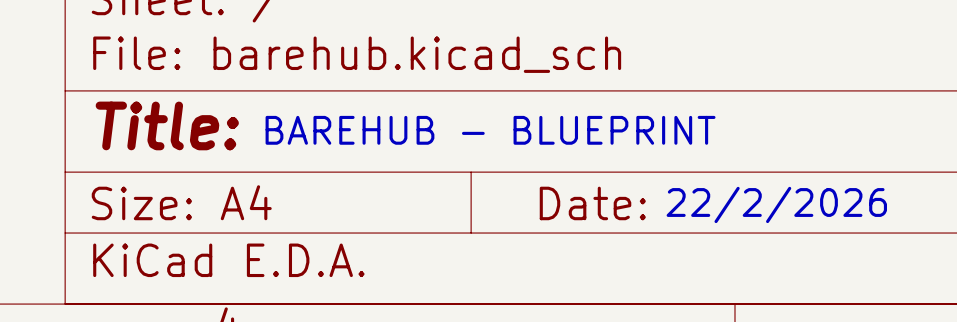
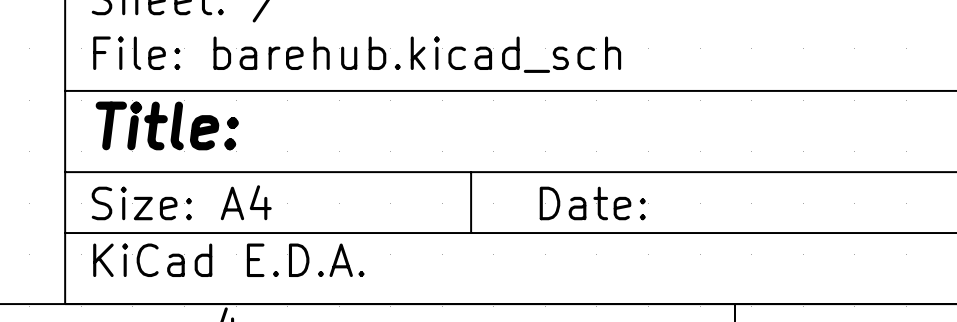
text: BAREHUB - BLUEPRINT (490, 130) -> none
text: 22/2/2026 (776, 204) -> none

